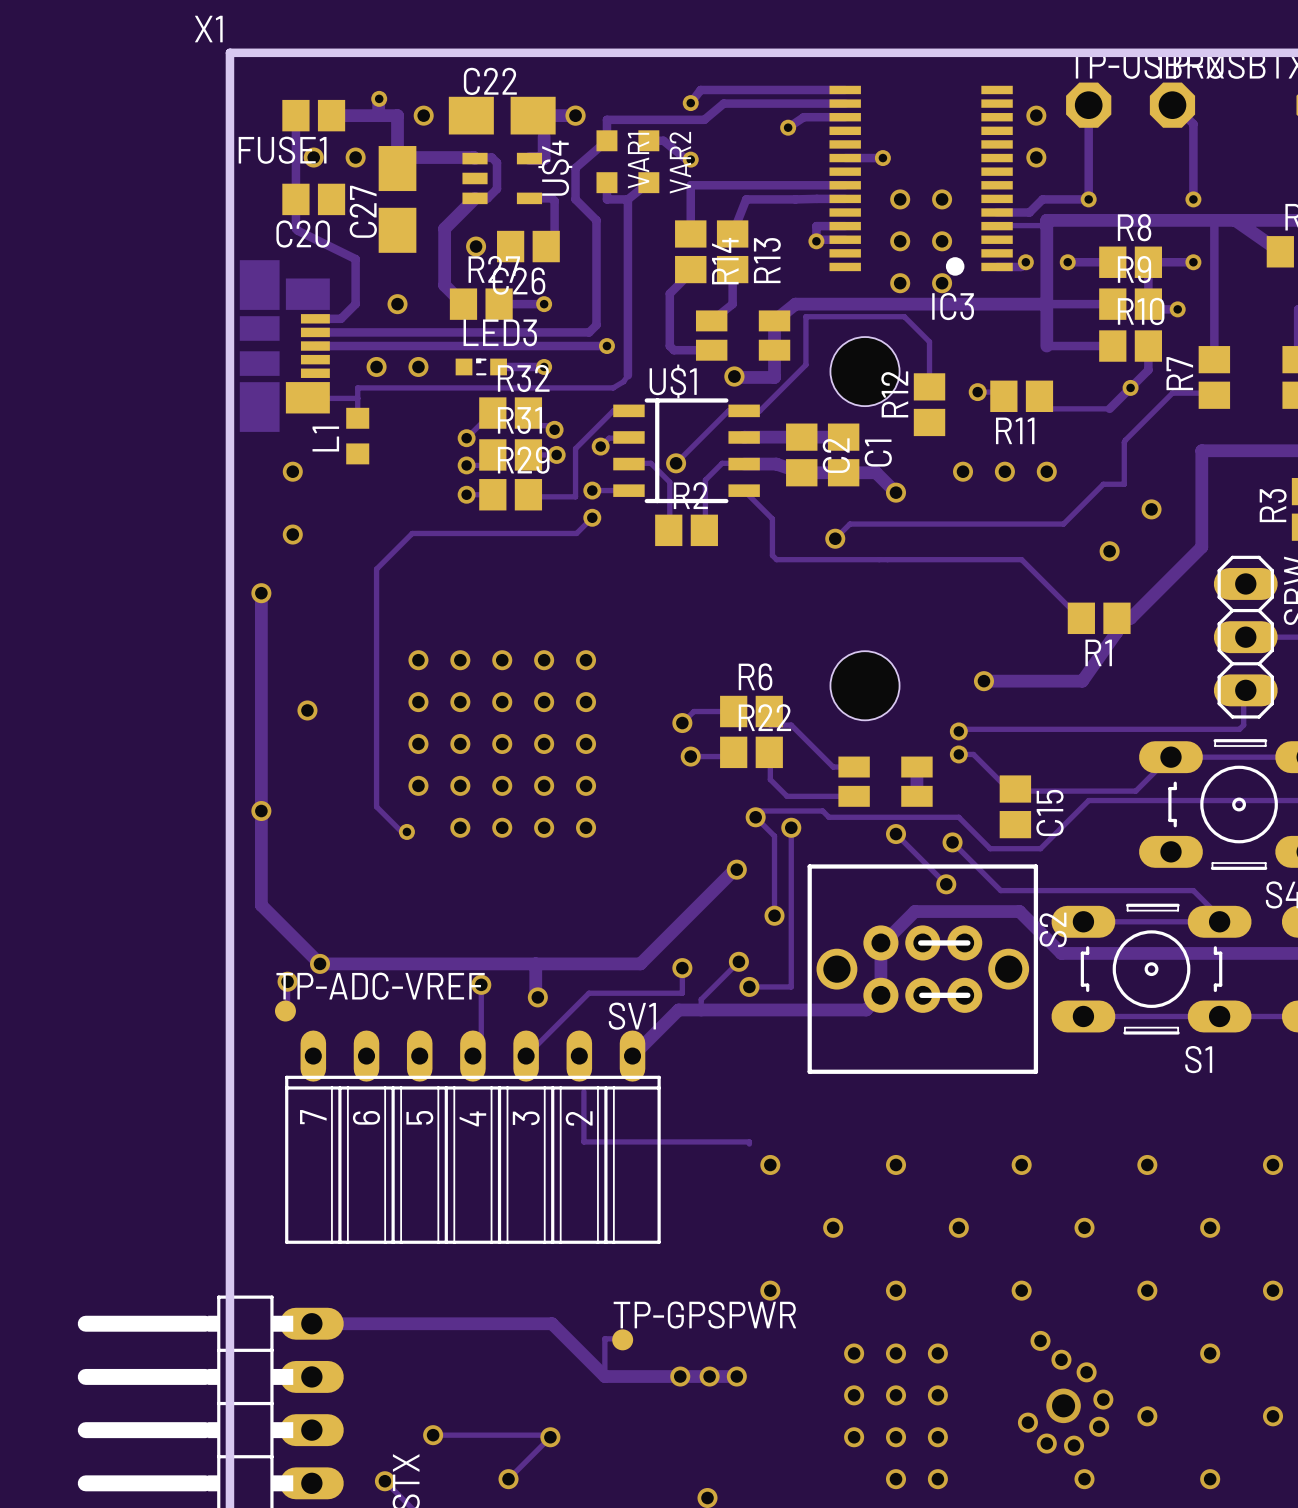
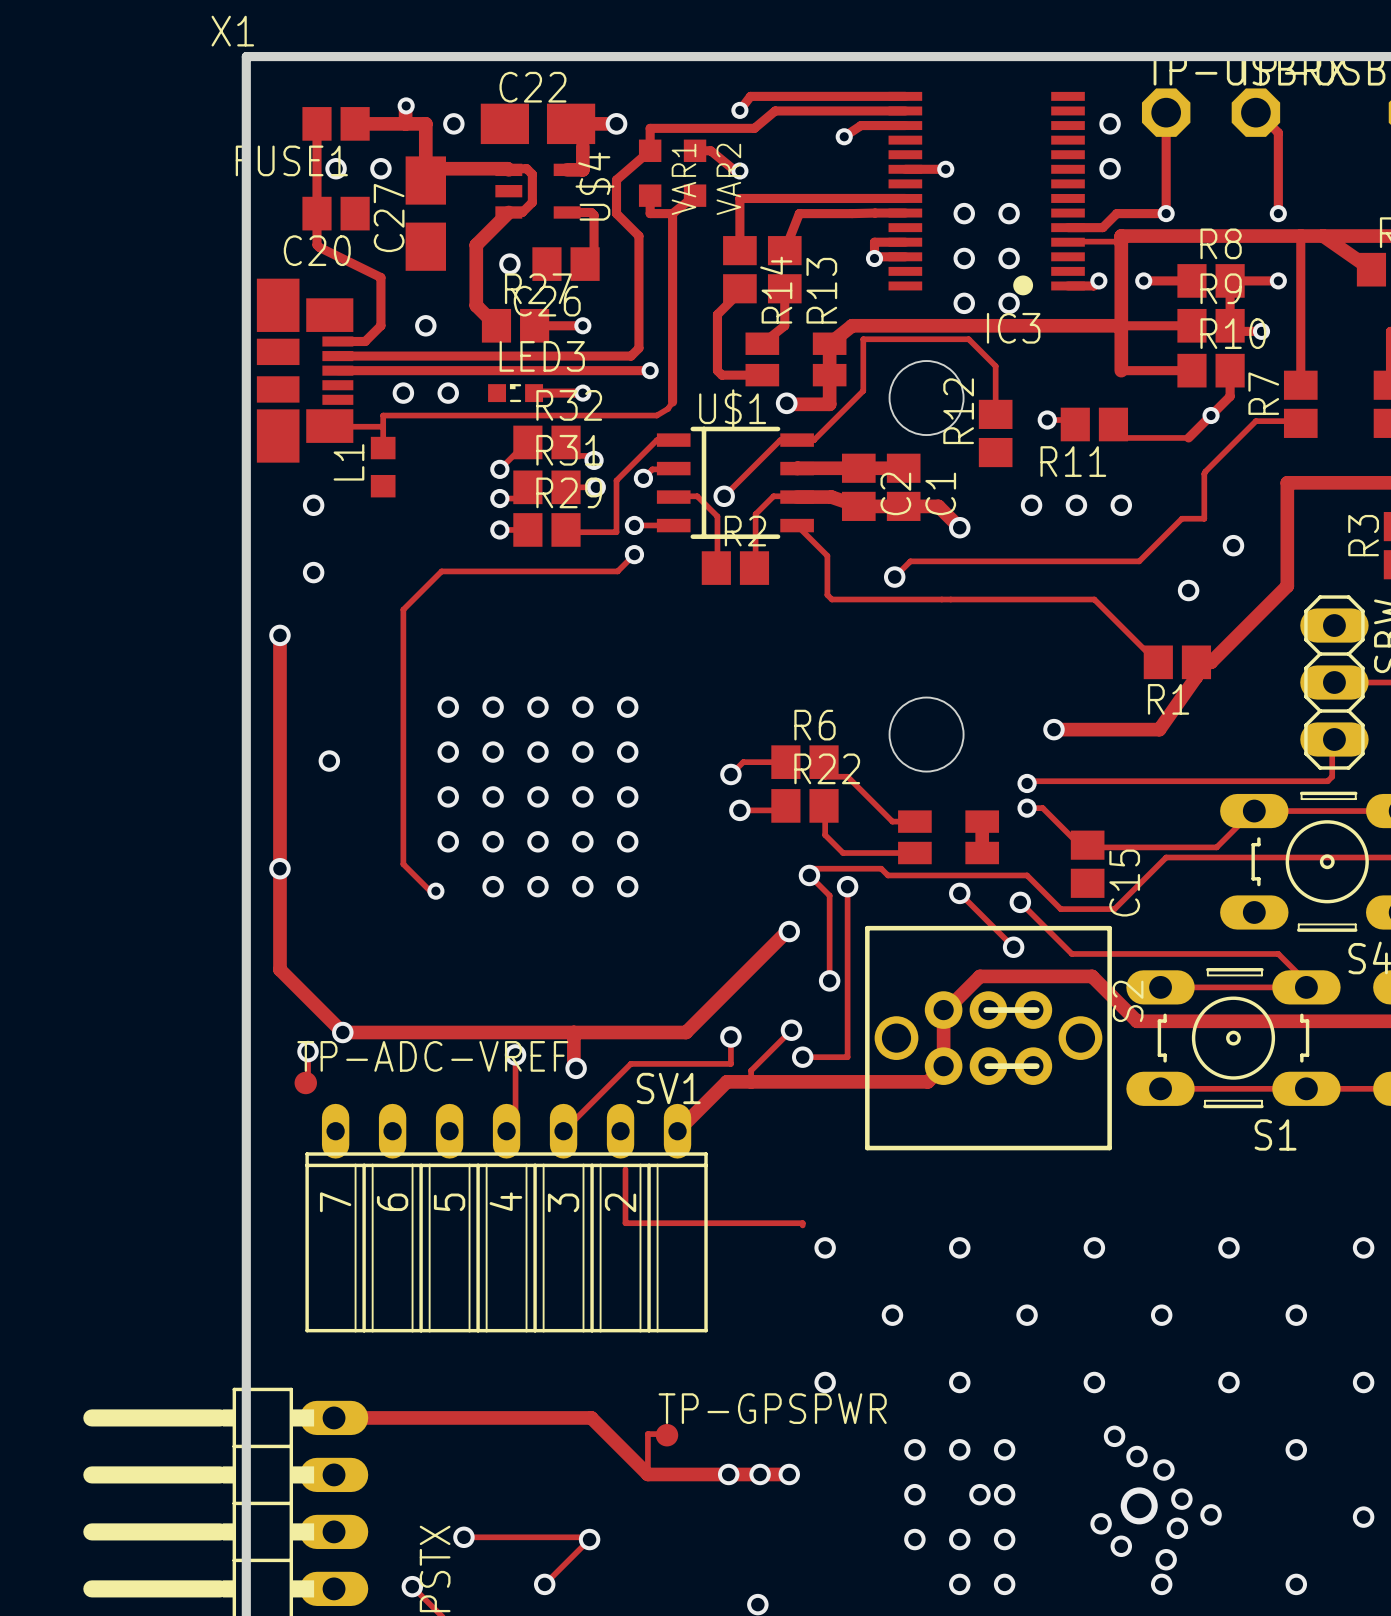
via position: (896, 1395) -> (979, 1494)
via position: (1147, 1416) -> (1211, 1514)
via position: (1074, 1445) -> (1166, 1559)

